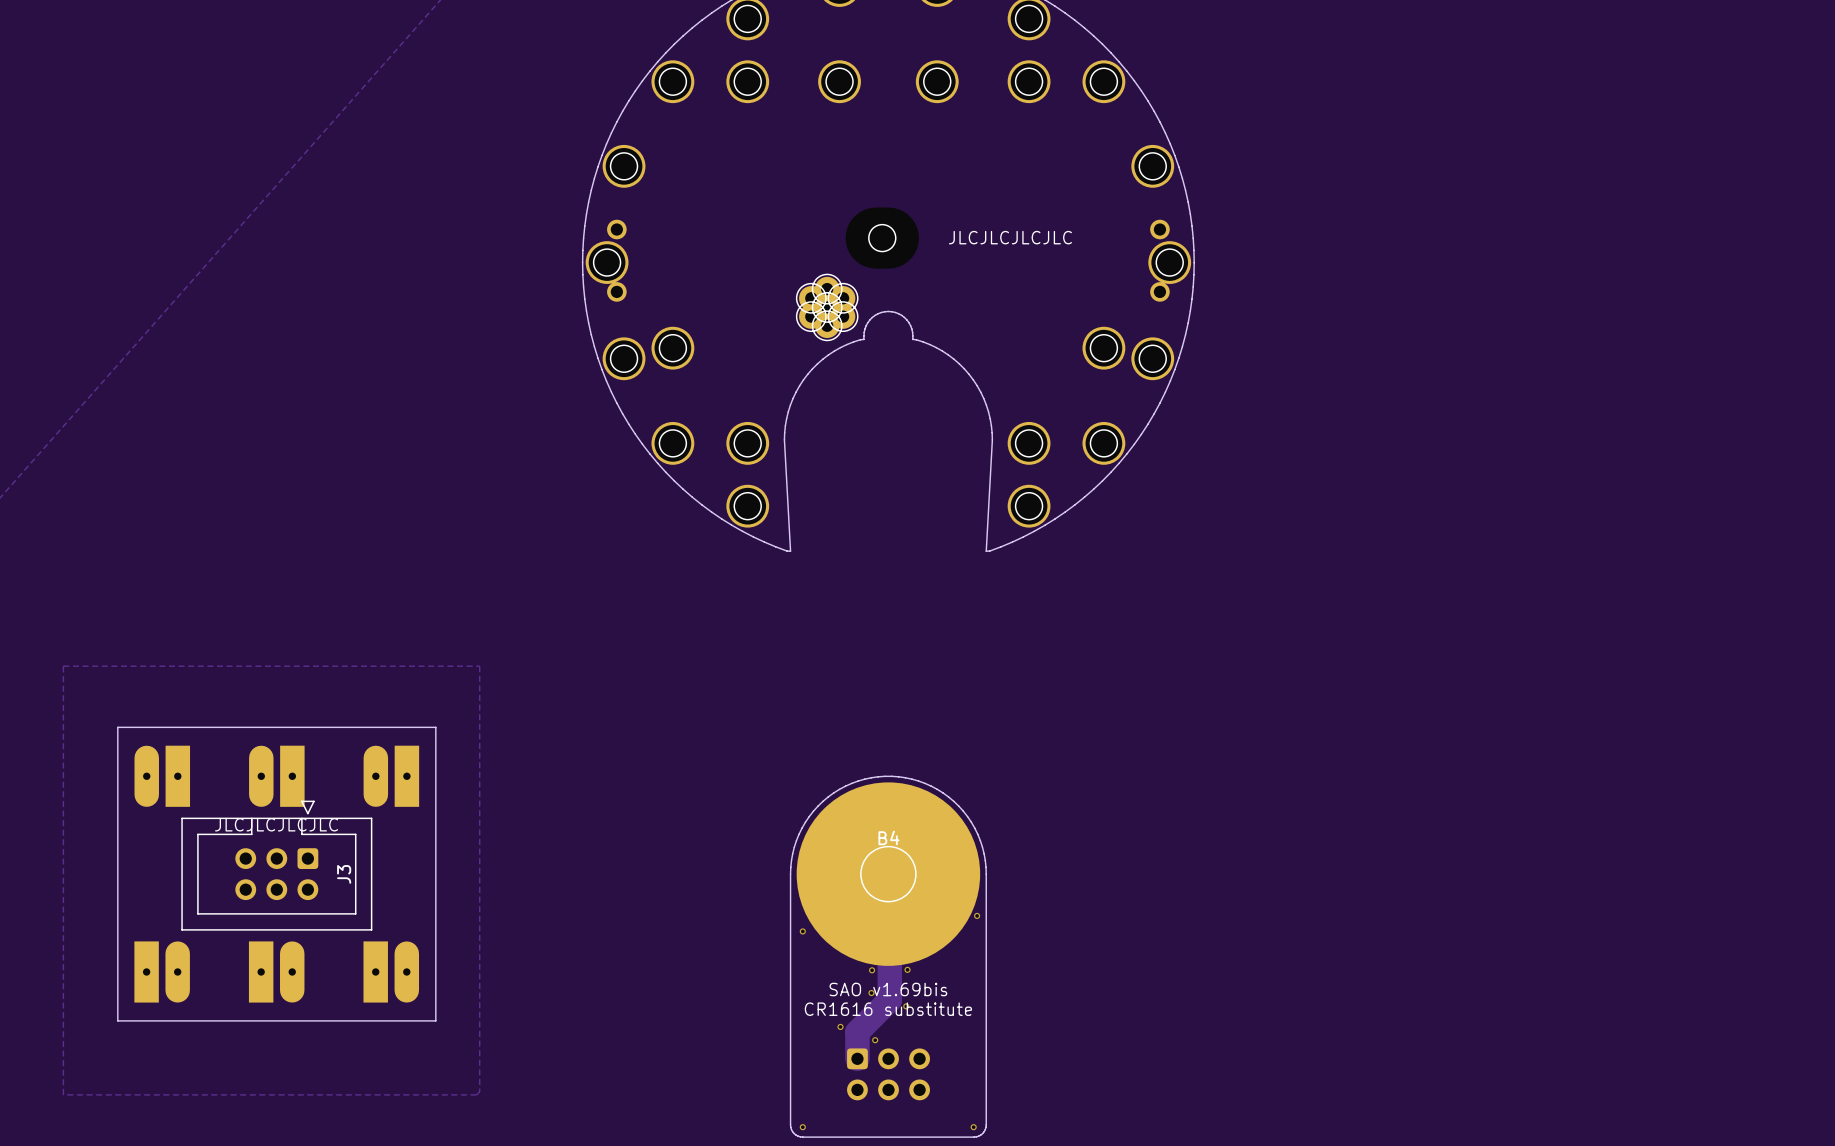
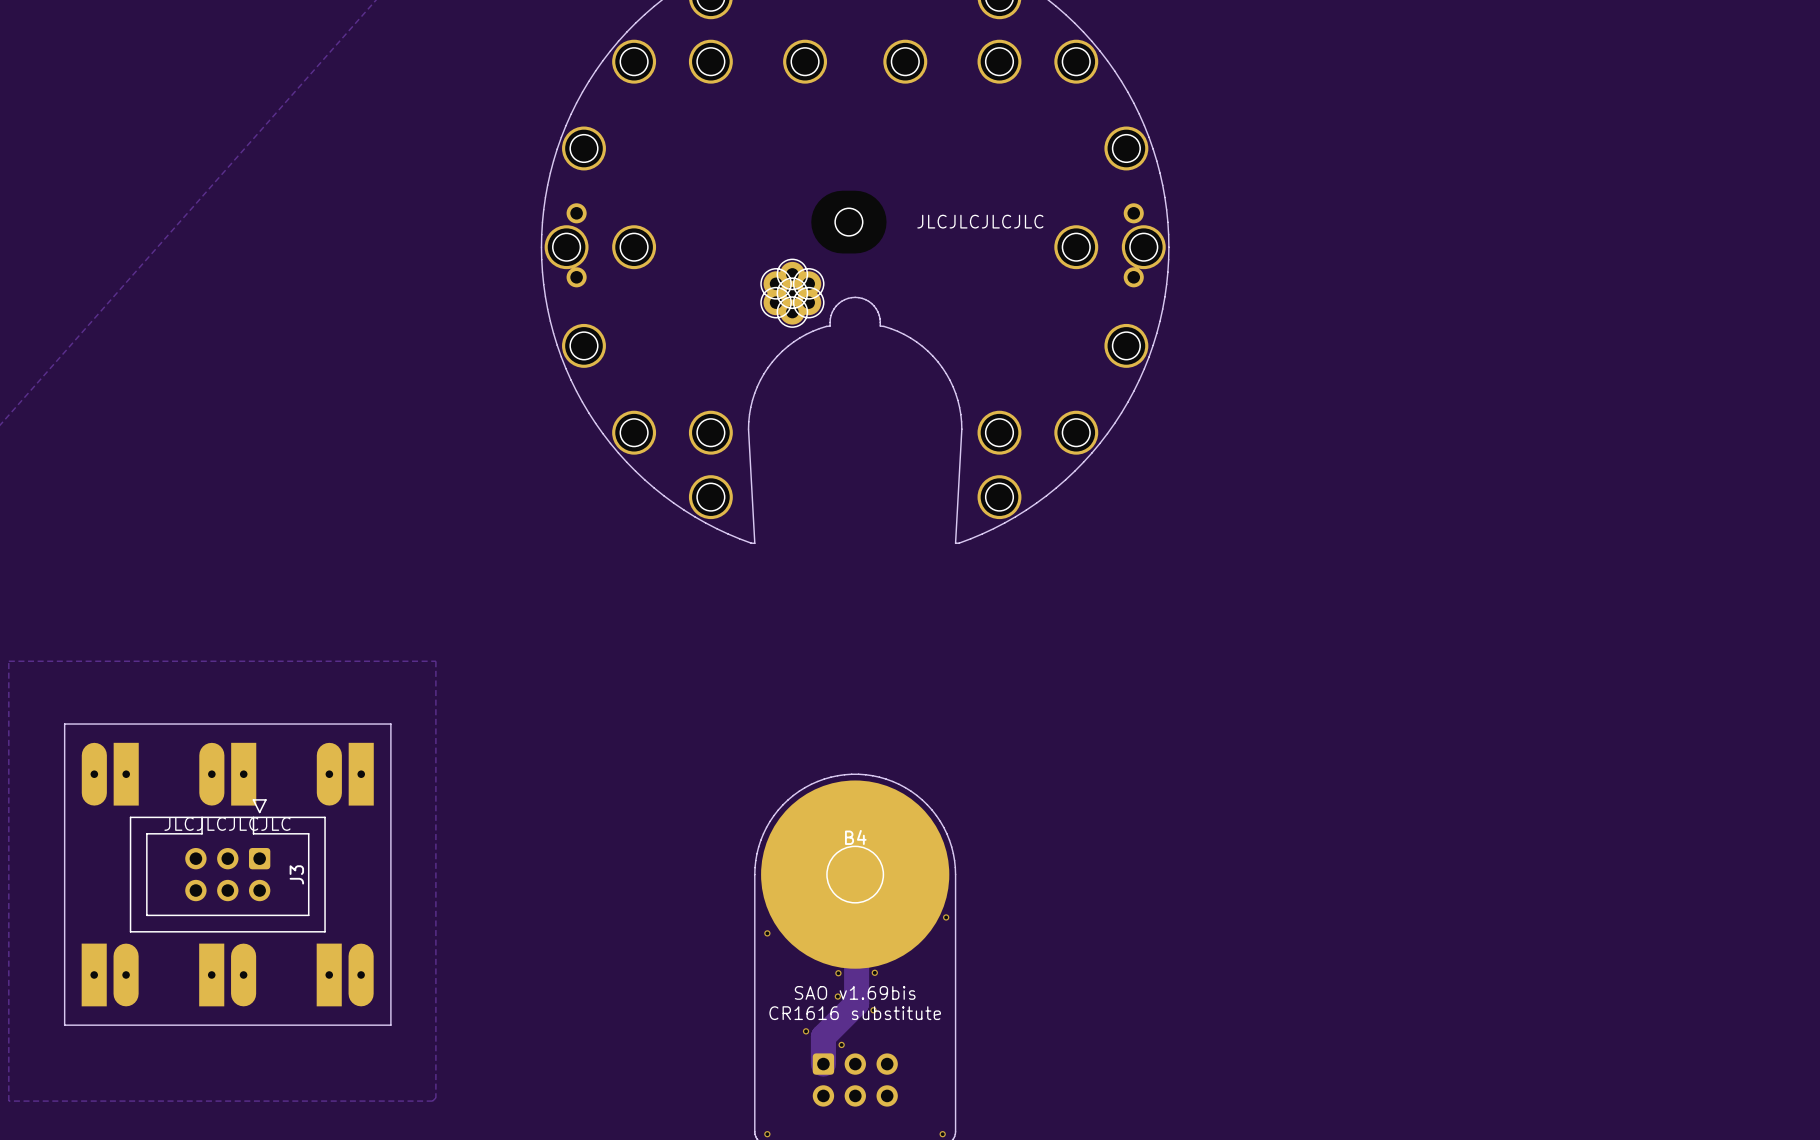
part position: (672, 348) -> (634, 247)
part position: (1103, 348) -> (1076, 247)

